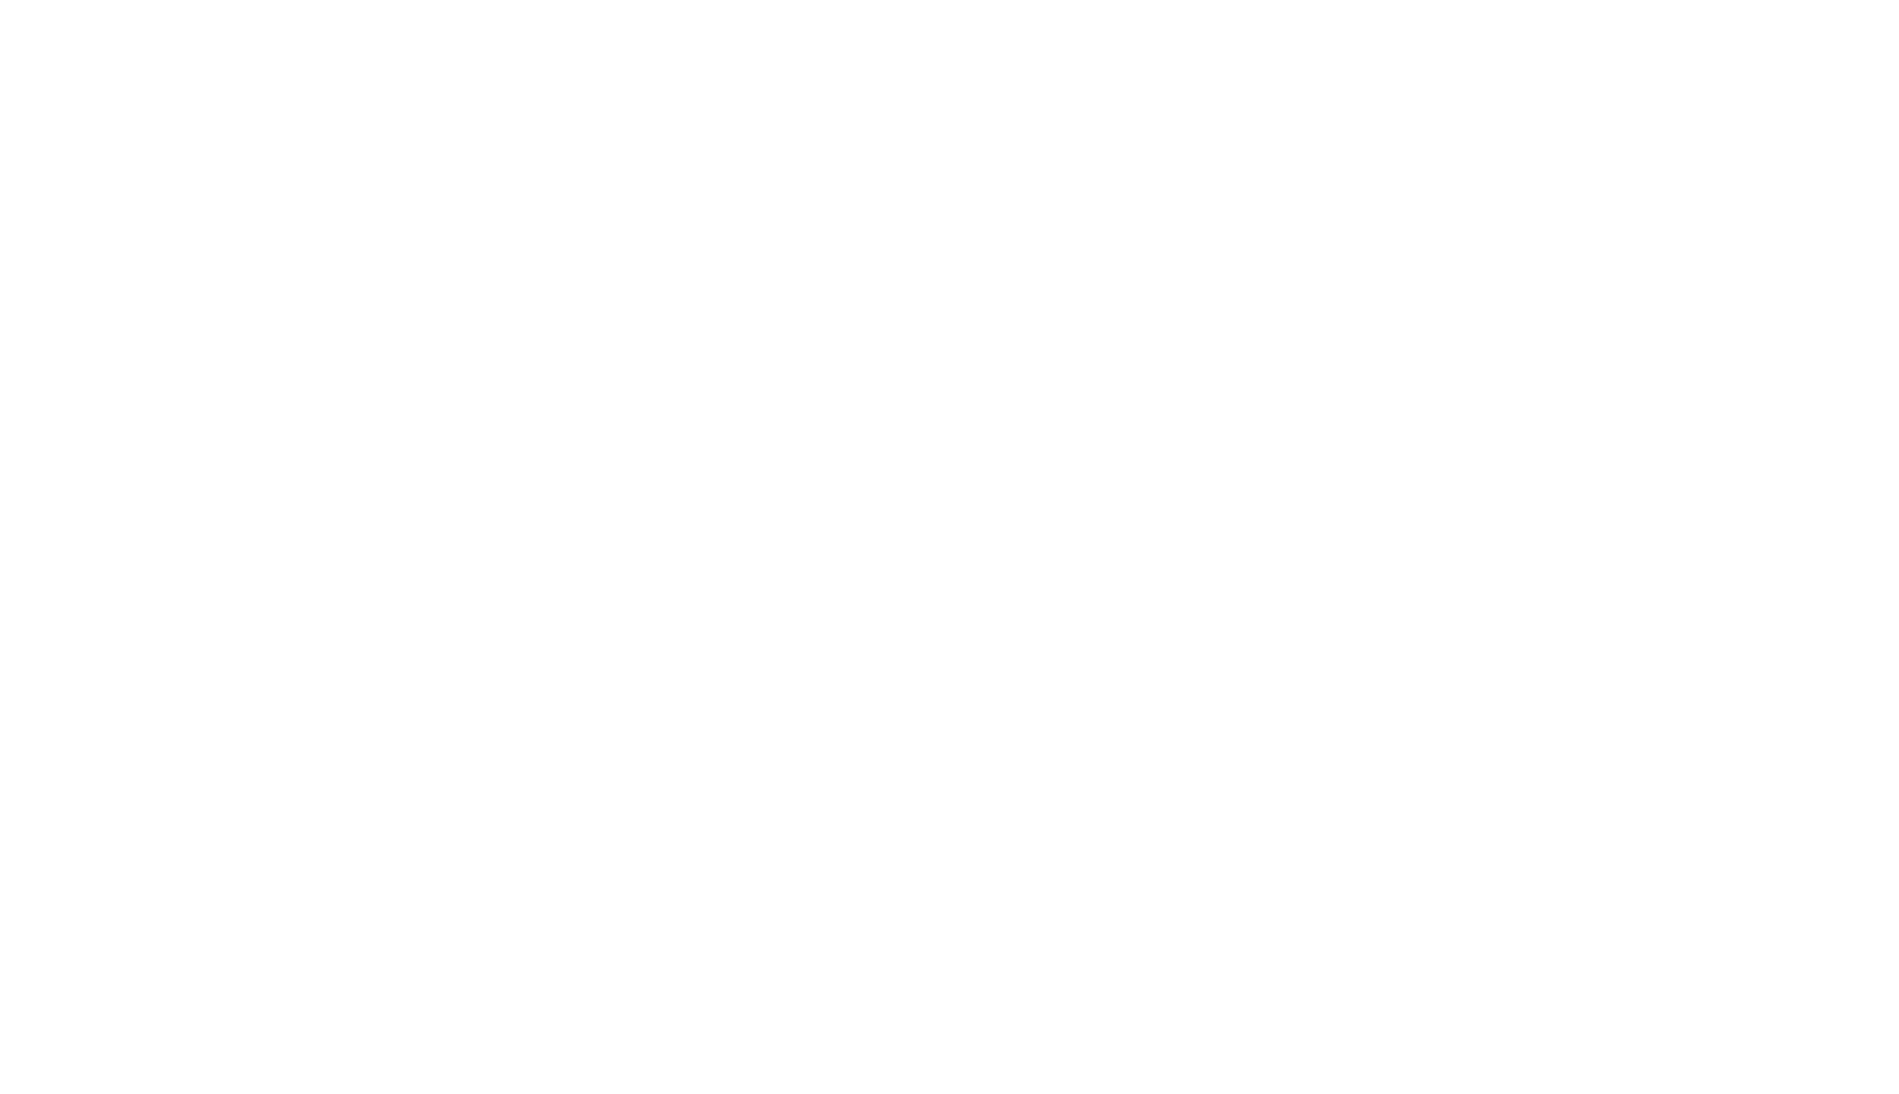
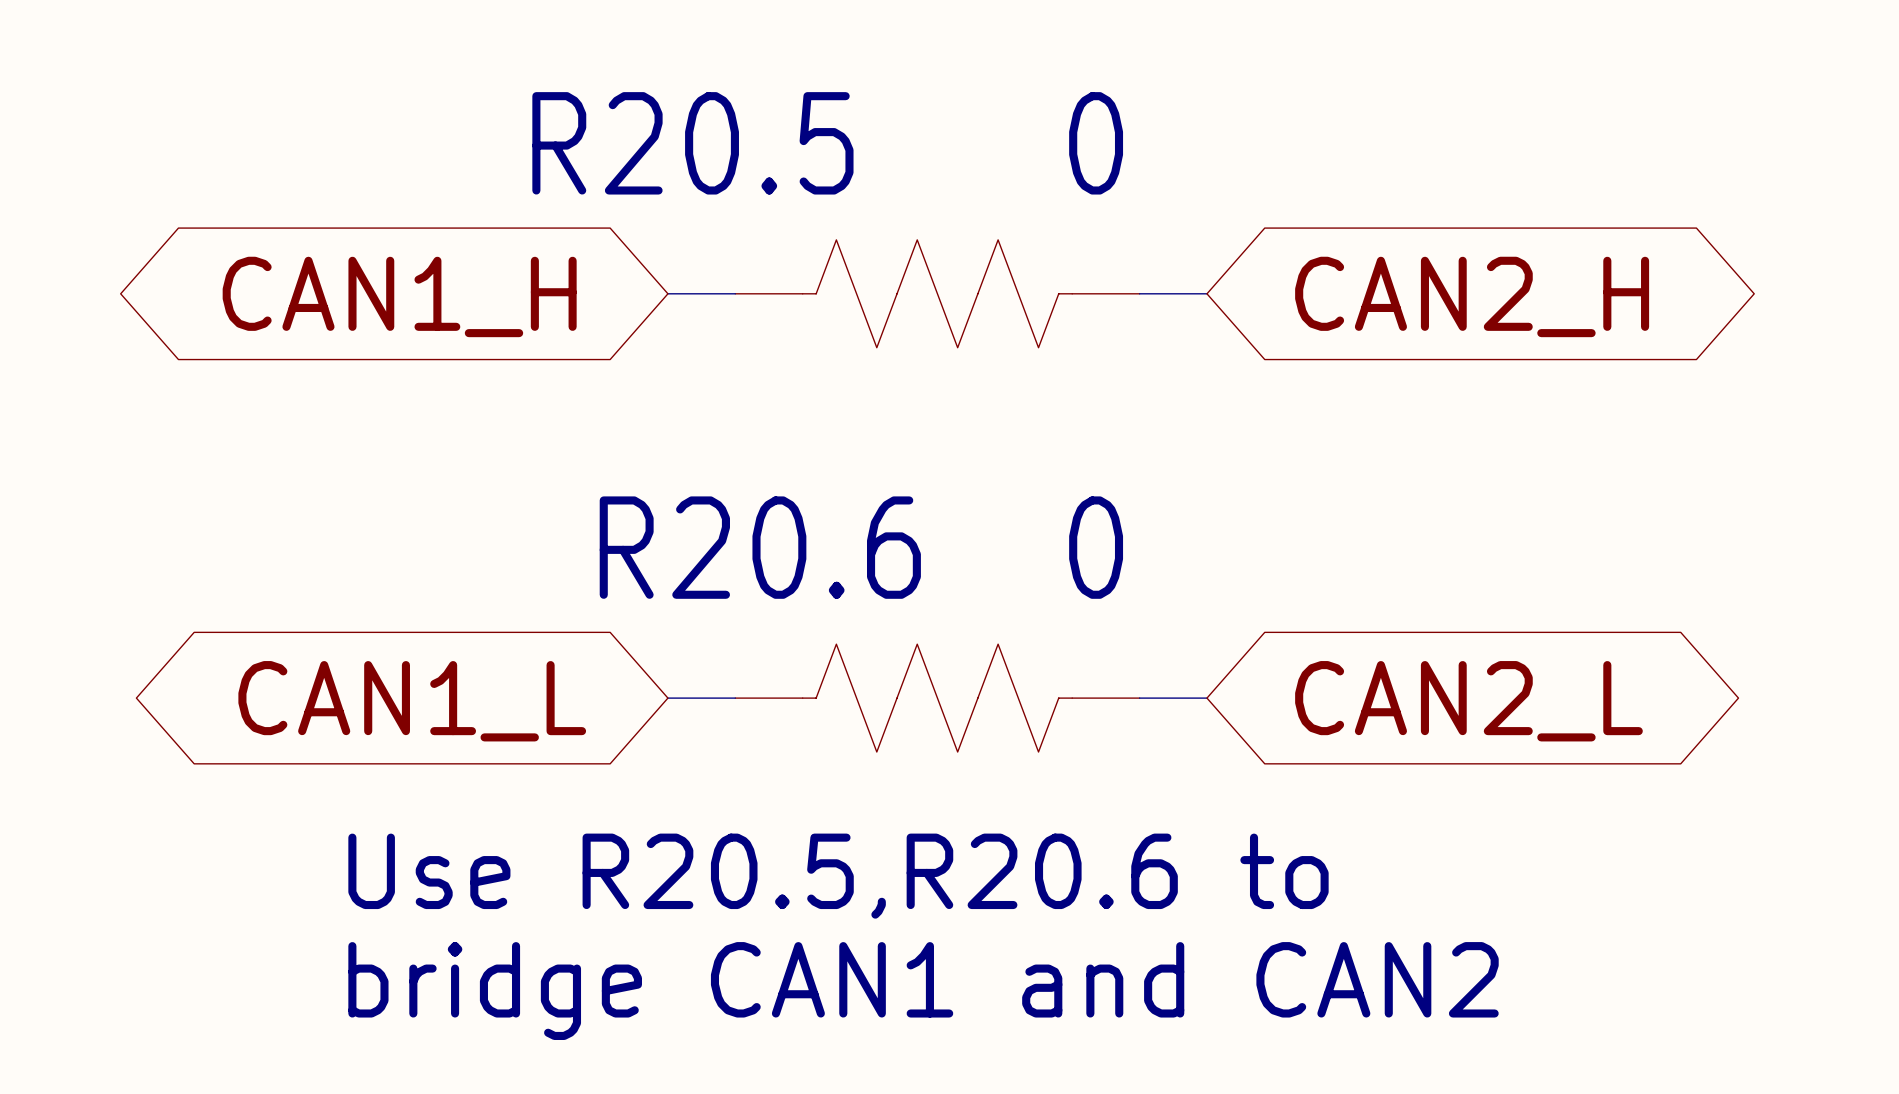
wire: none -> (667, 293) (735, 293)
R20.5: none -> 0 (937, 293)
wire: none -> (1139, 293) (1206, 293)
global label: none -> CAN1_H (399, 296)
global label: none -> CAN2_H (1472, 296)
wire: none -> (667, 698) (735, 698)
R20.6: none -> 0 (937, 698)
wire: none -> (1139, 698) (1206, 698)
global label: none -> CAN1_L (412, 701)
global label: none -> CAN2_L (1468, 701)
text: none -> Use R20.5,R20.6 to (838, 876)
text: none -> bridge CAN1 and CAN2 (923, 991)

